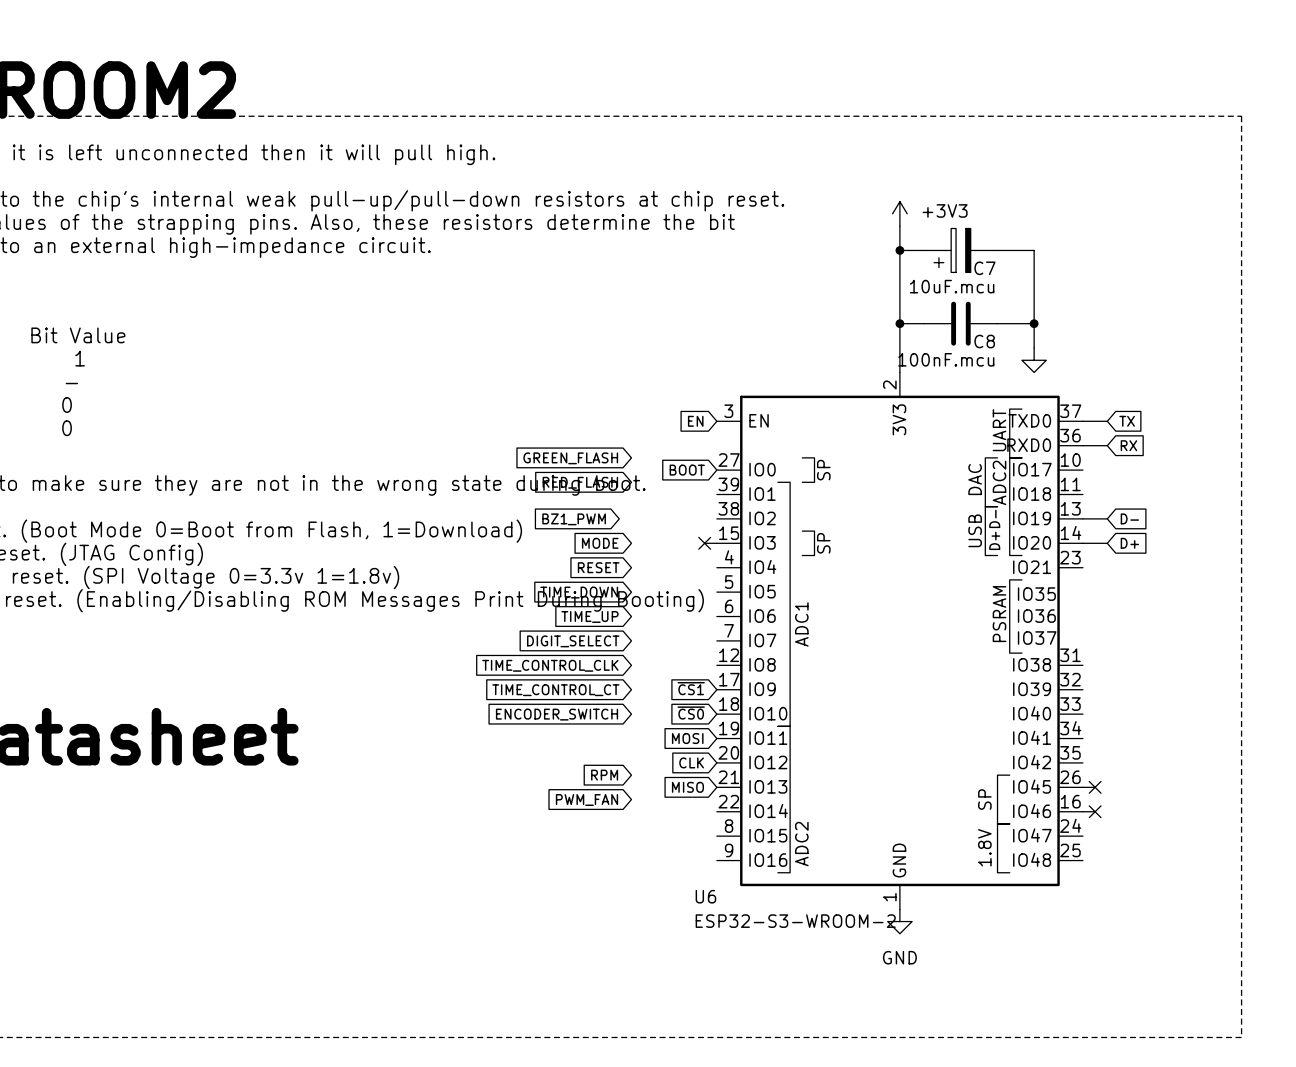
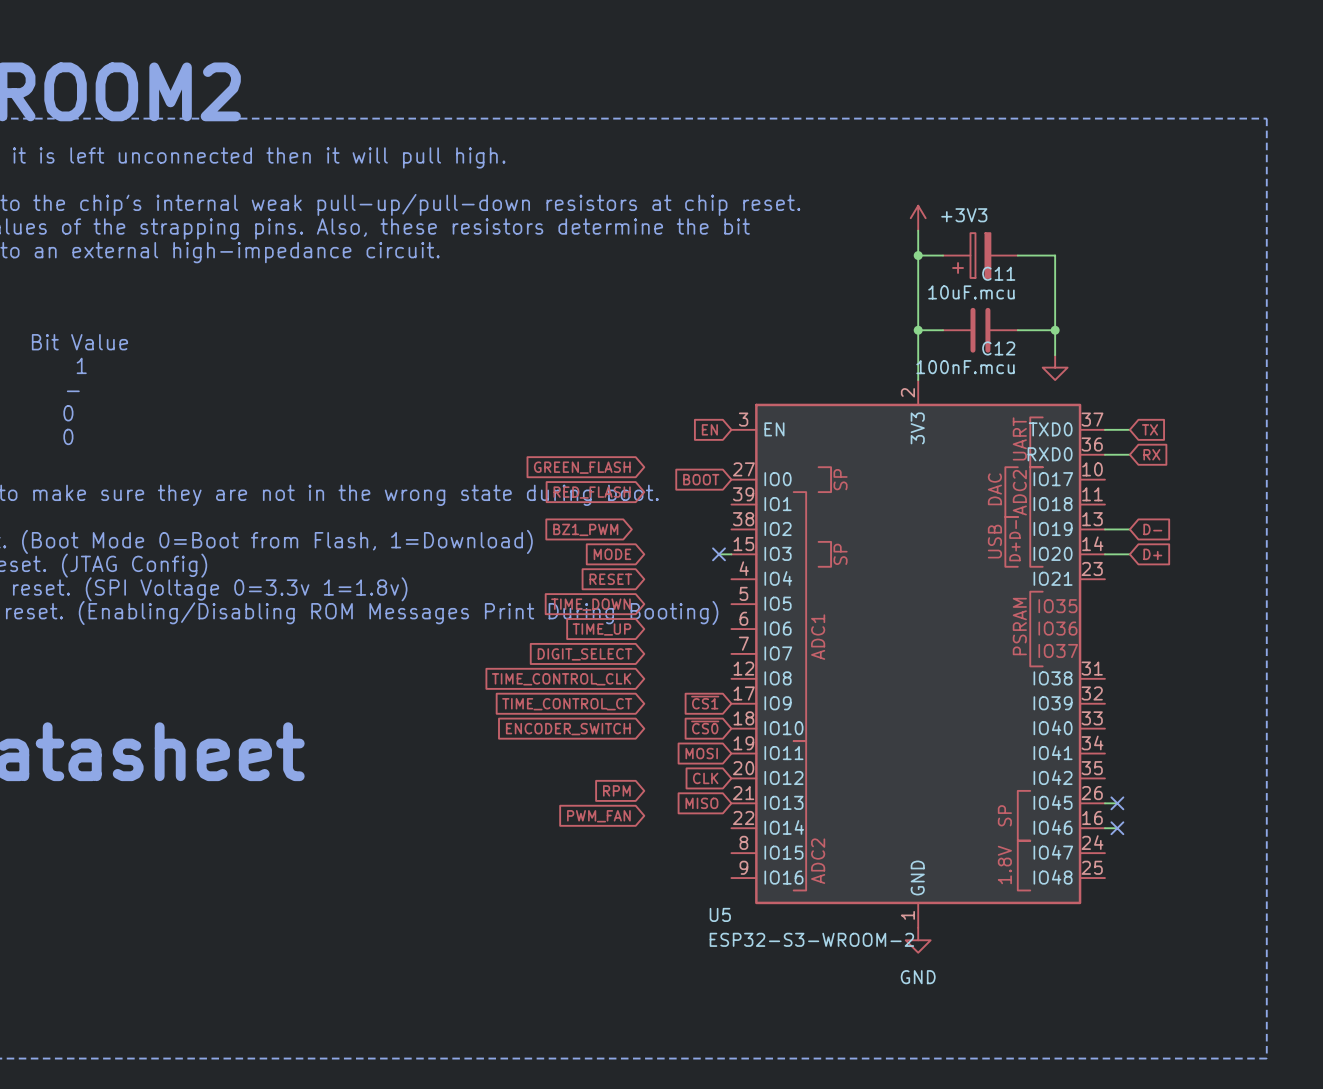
C7 name: C7 (984, 268) -> C11 (998, 273)
C8 name: C8 (984, 341) -> C12 (998, 348)
U6 name: U6 (705, 896) -> U5 (720, 914)

